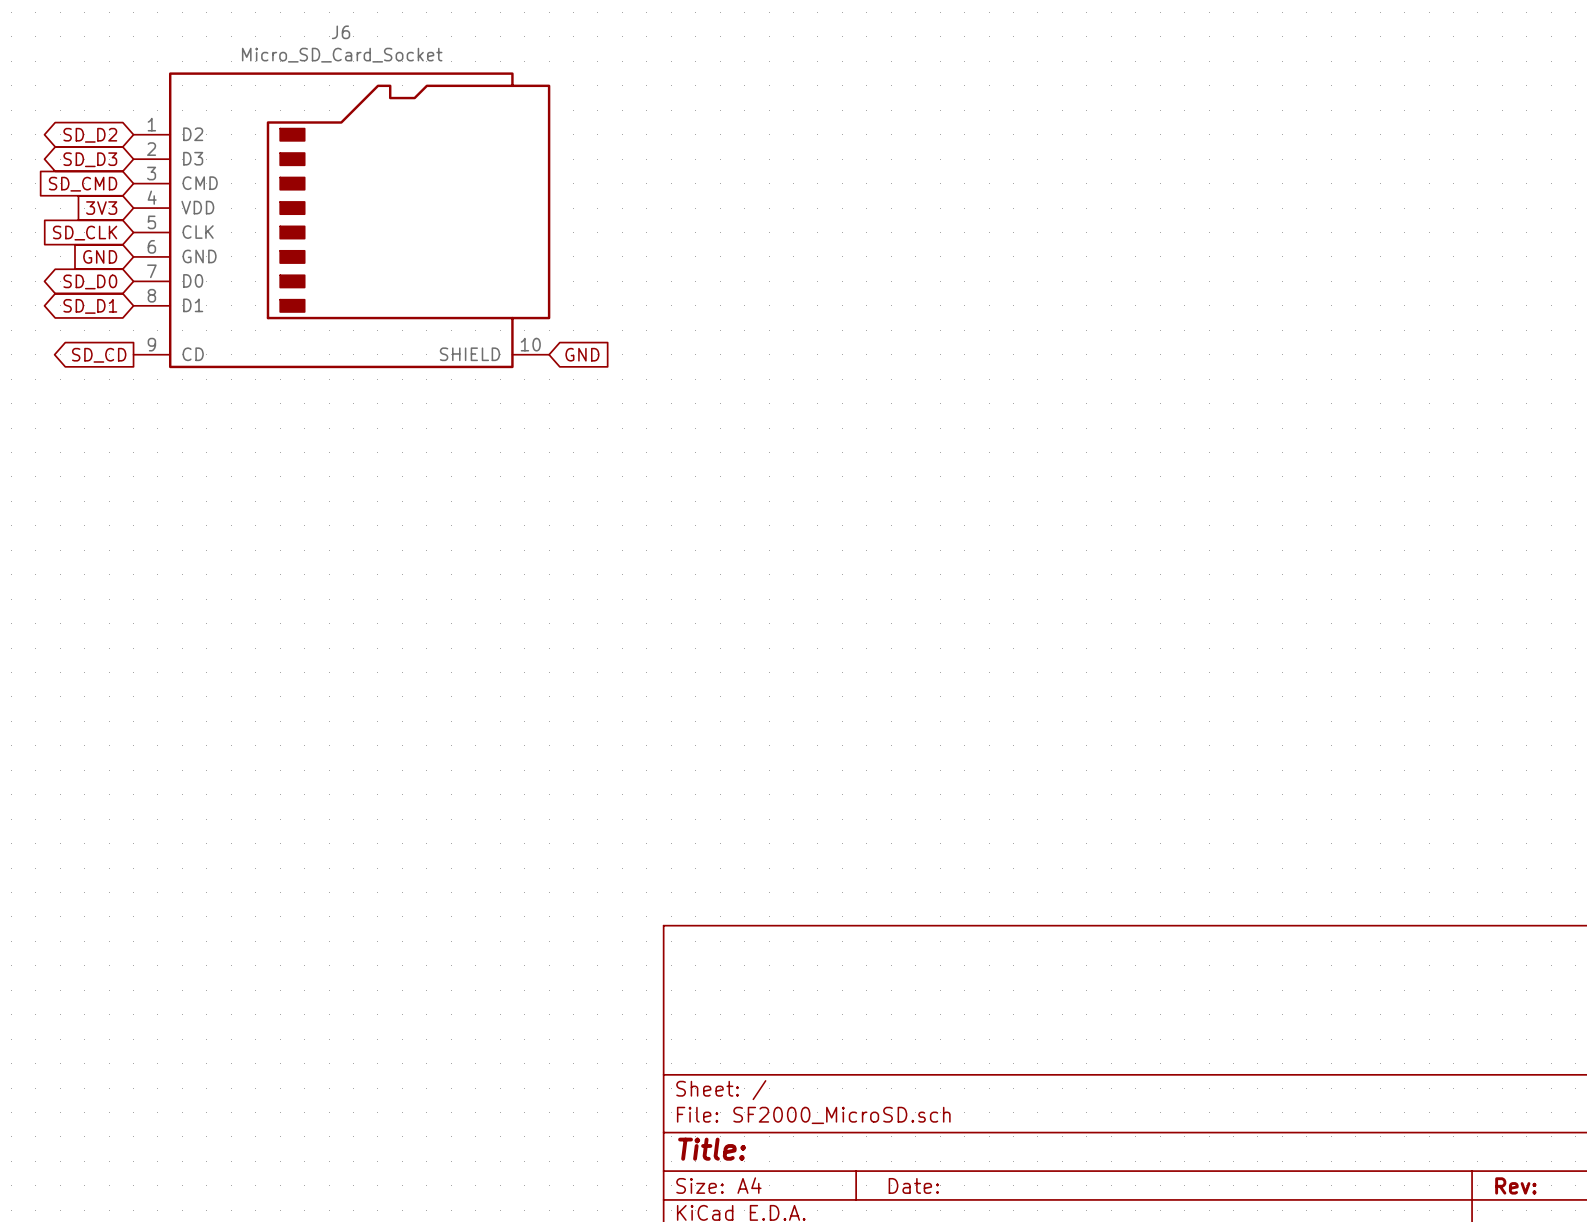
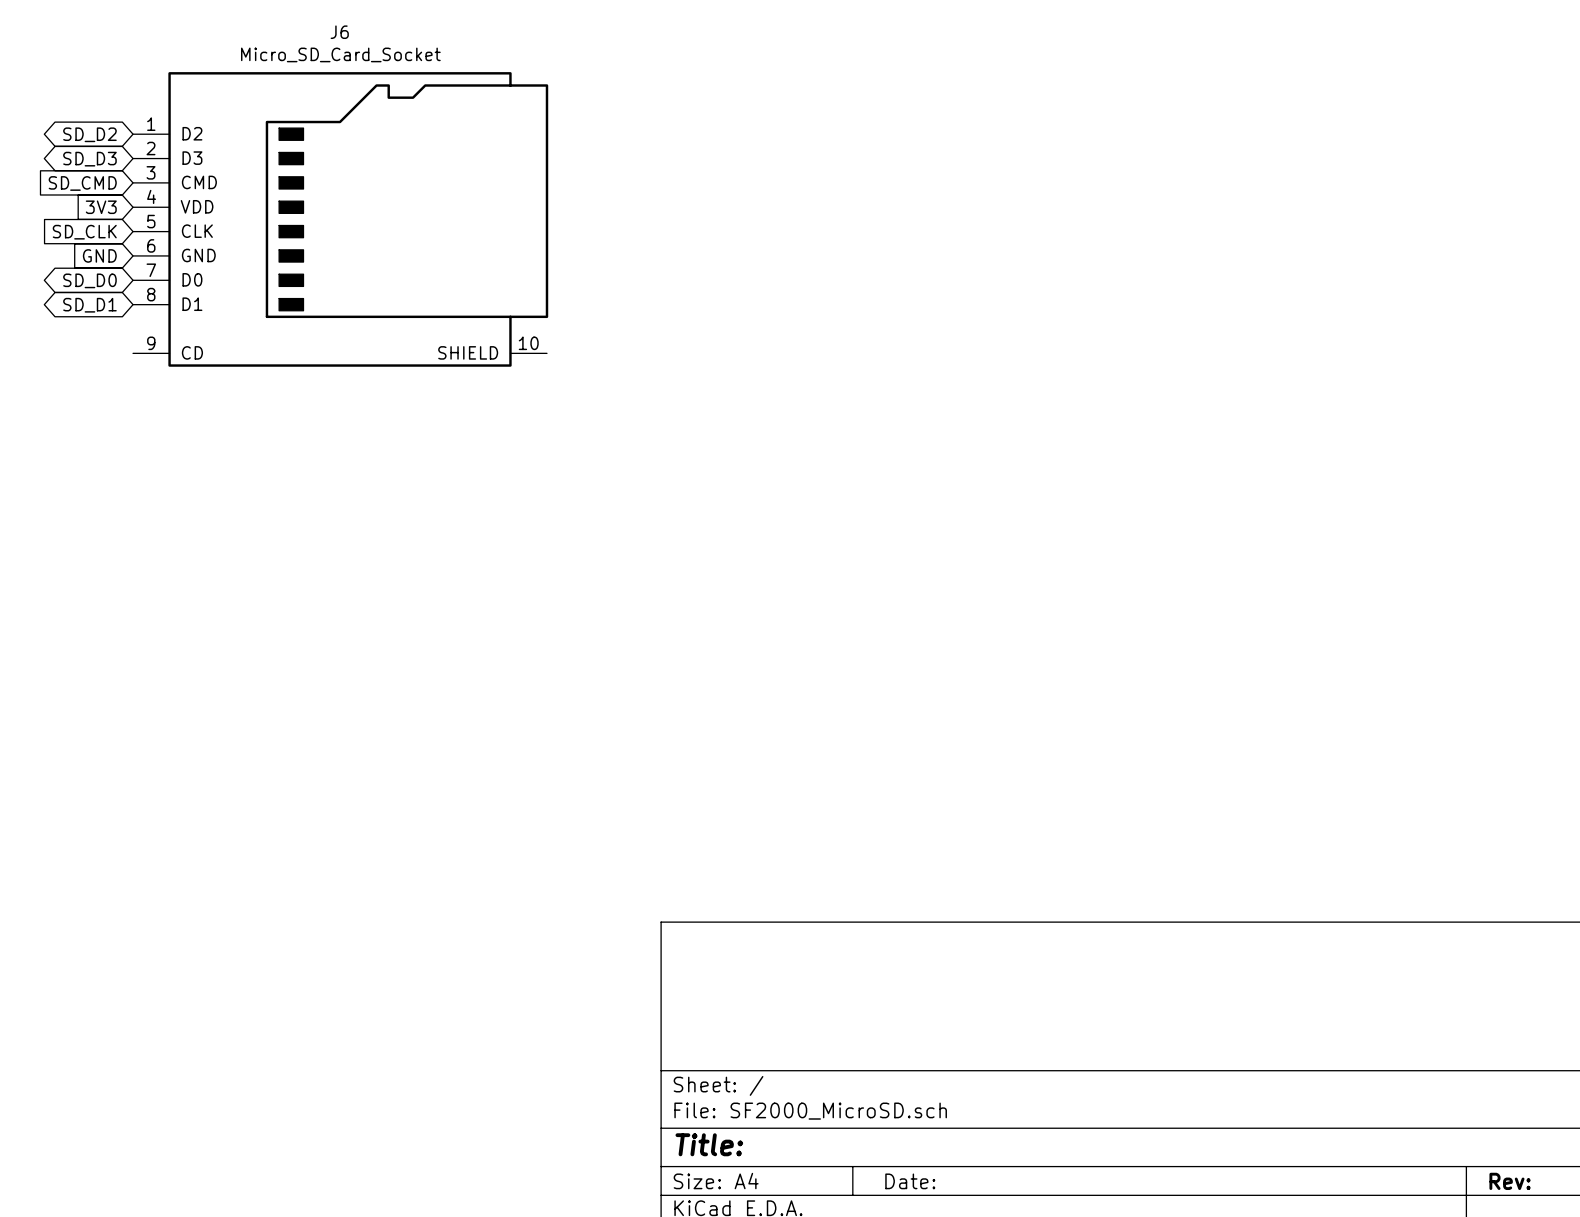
global label: GND (582, 354) -> none
global label: SD_CD (99, 355) -> none

